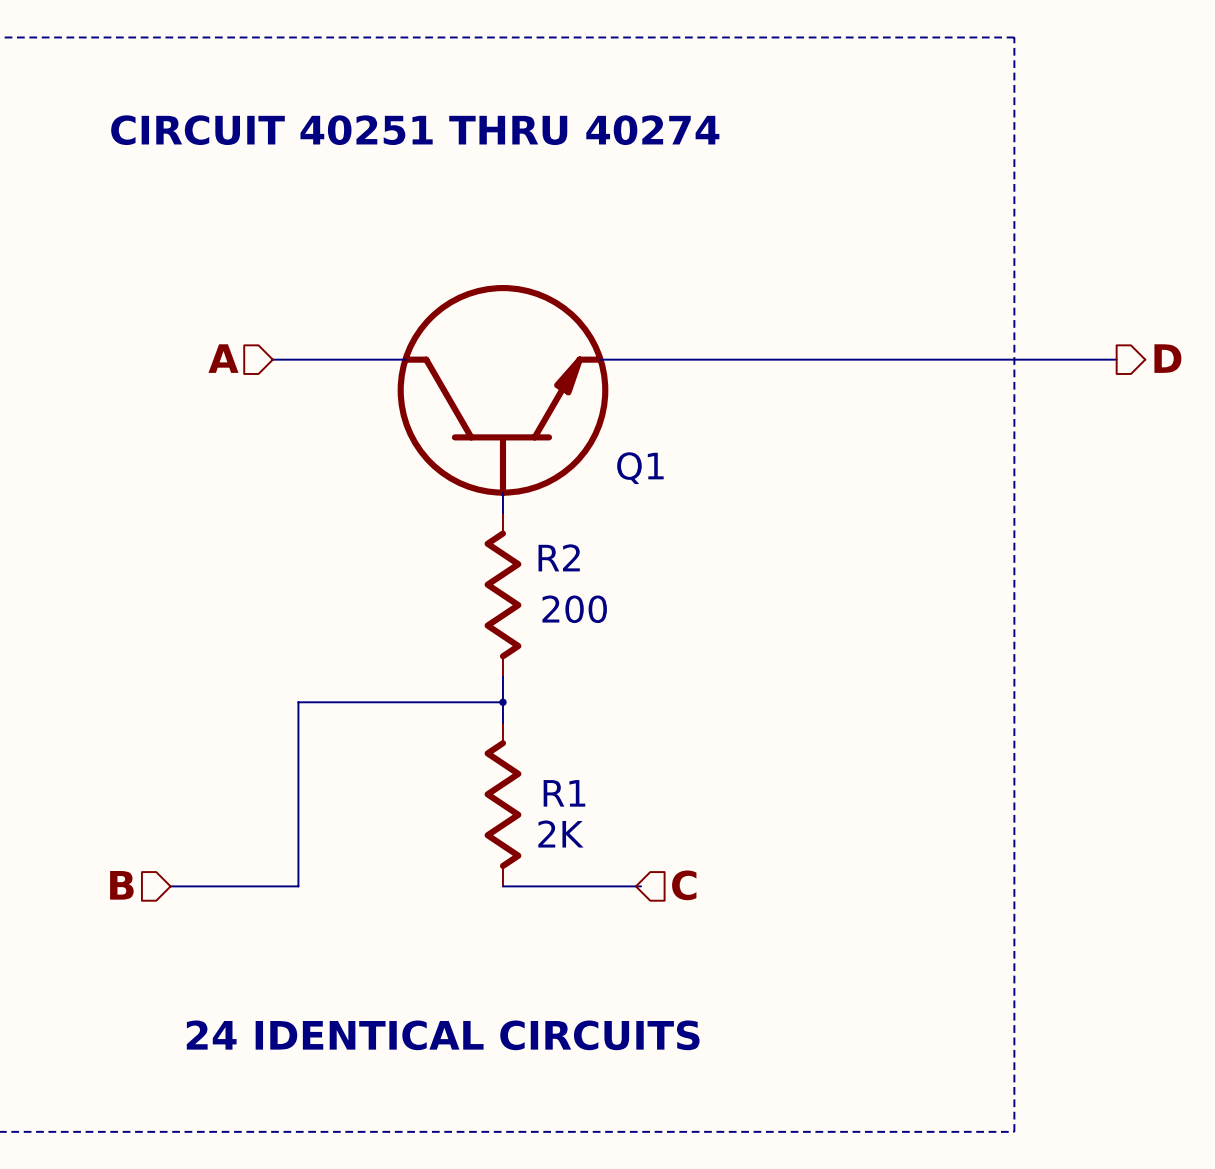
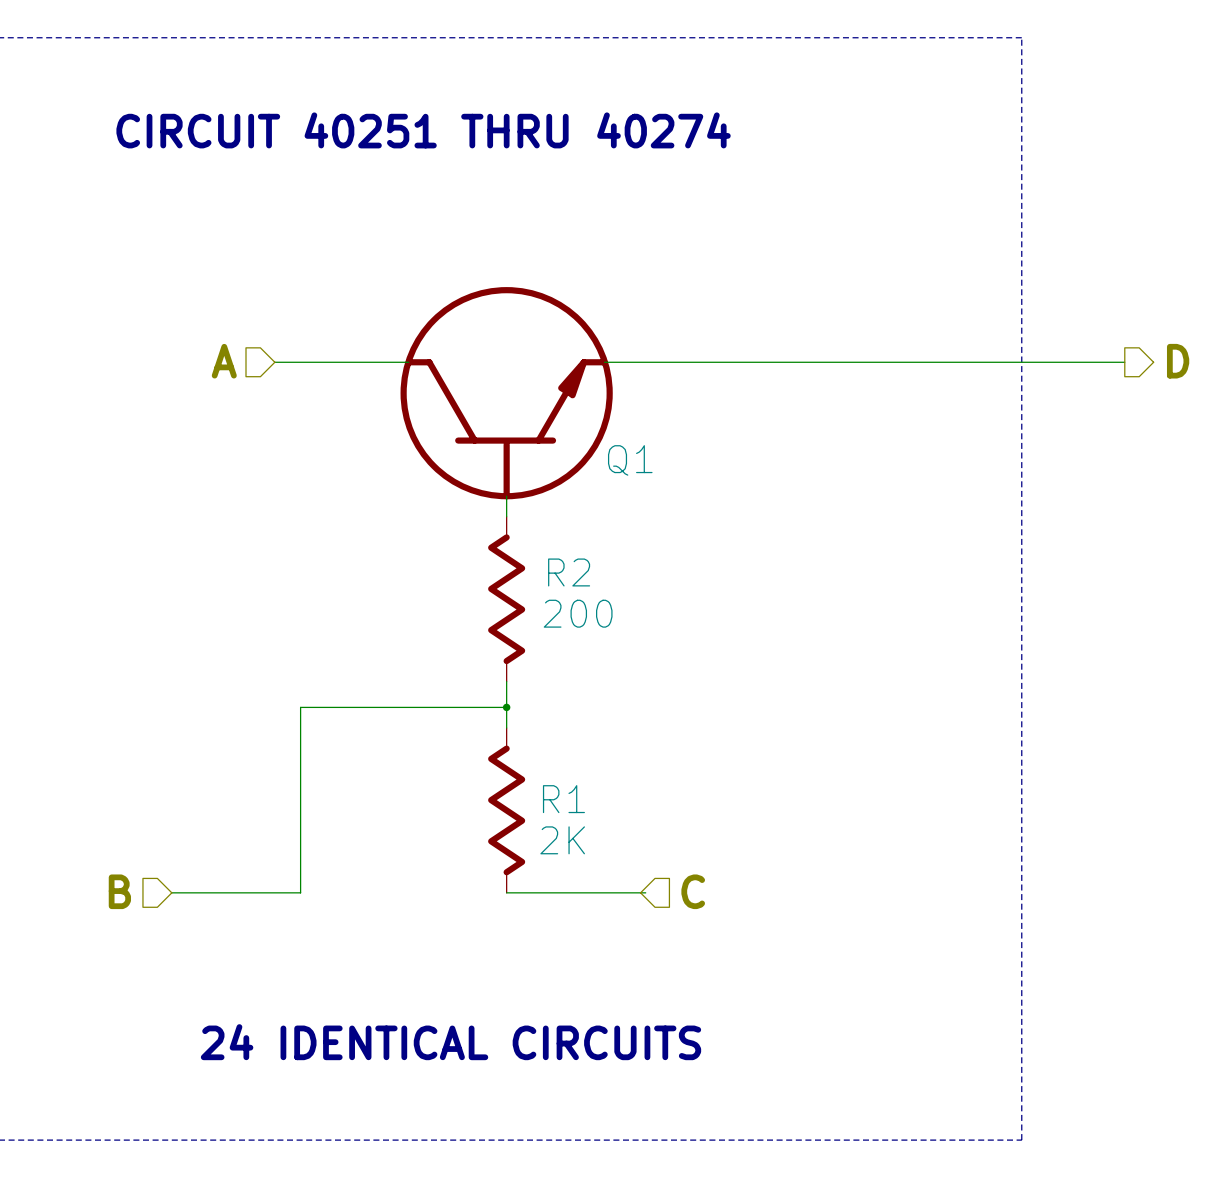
Q1 text: none -> Q1 (630, 460)
Q1 name: Q1 (640, 468) -> none
R2 name: R2 (559, 557) -> none
R2 text: none -> R2 (569, 572)
R1 text: none -> R1 (563, 799)
R1 name: R1 (564, 793) -> none

